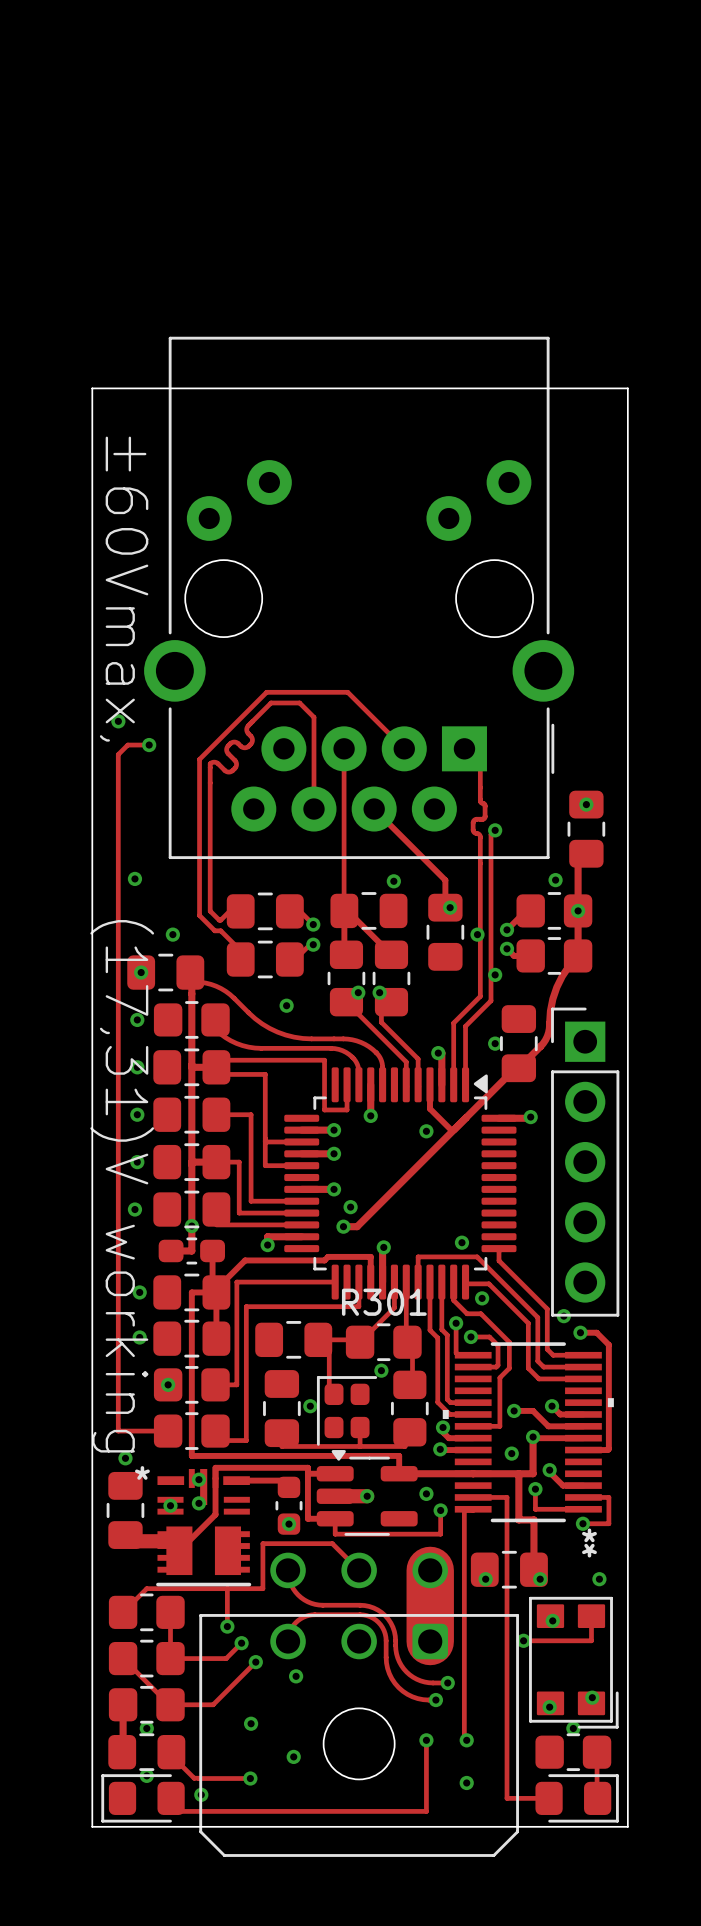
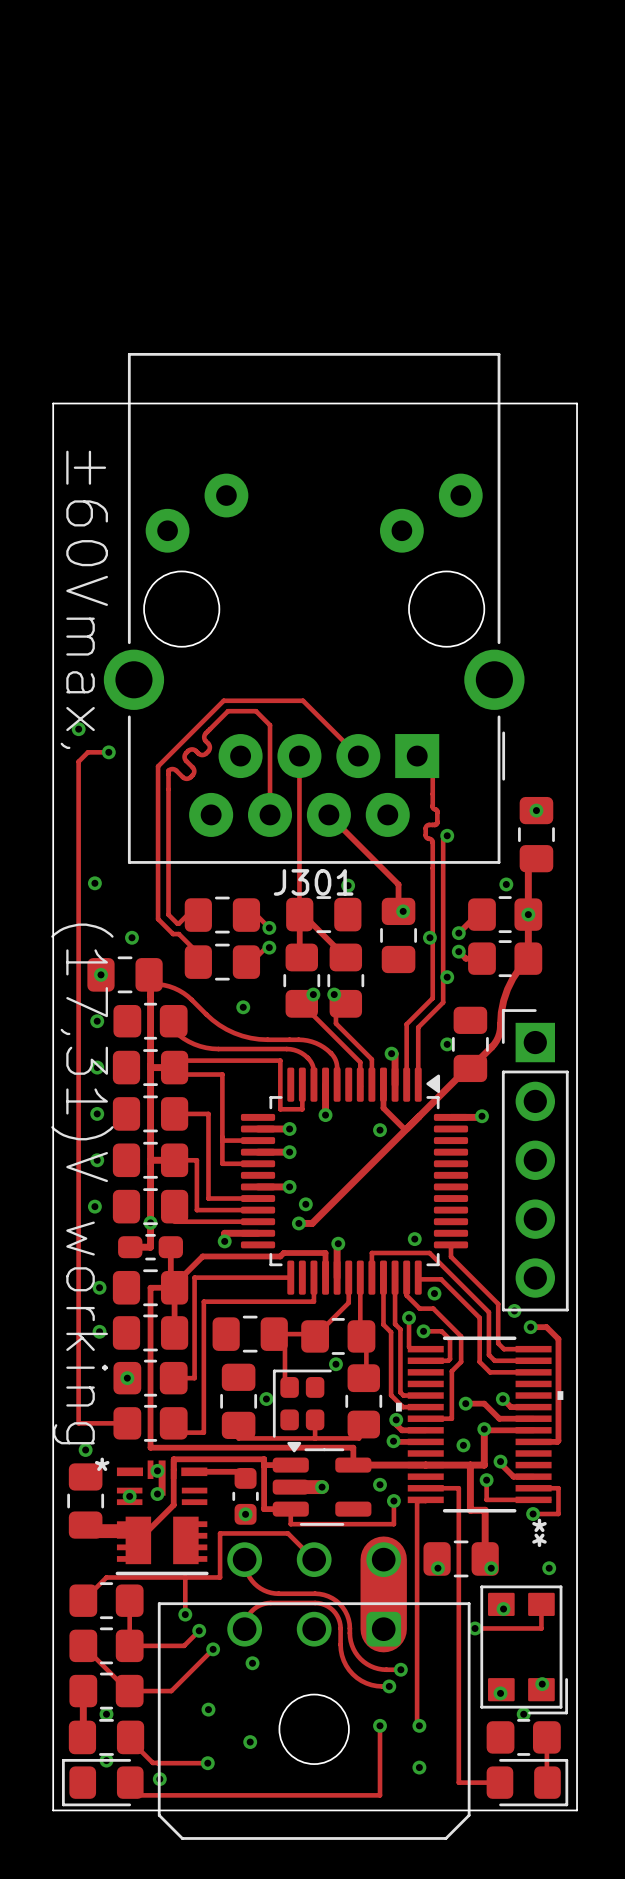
J301 name: none -> J301 (313, 882)
R301 name: R301 (384, 1302) -> none

